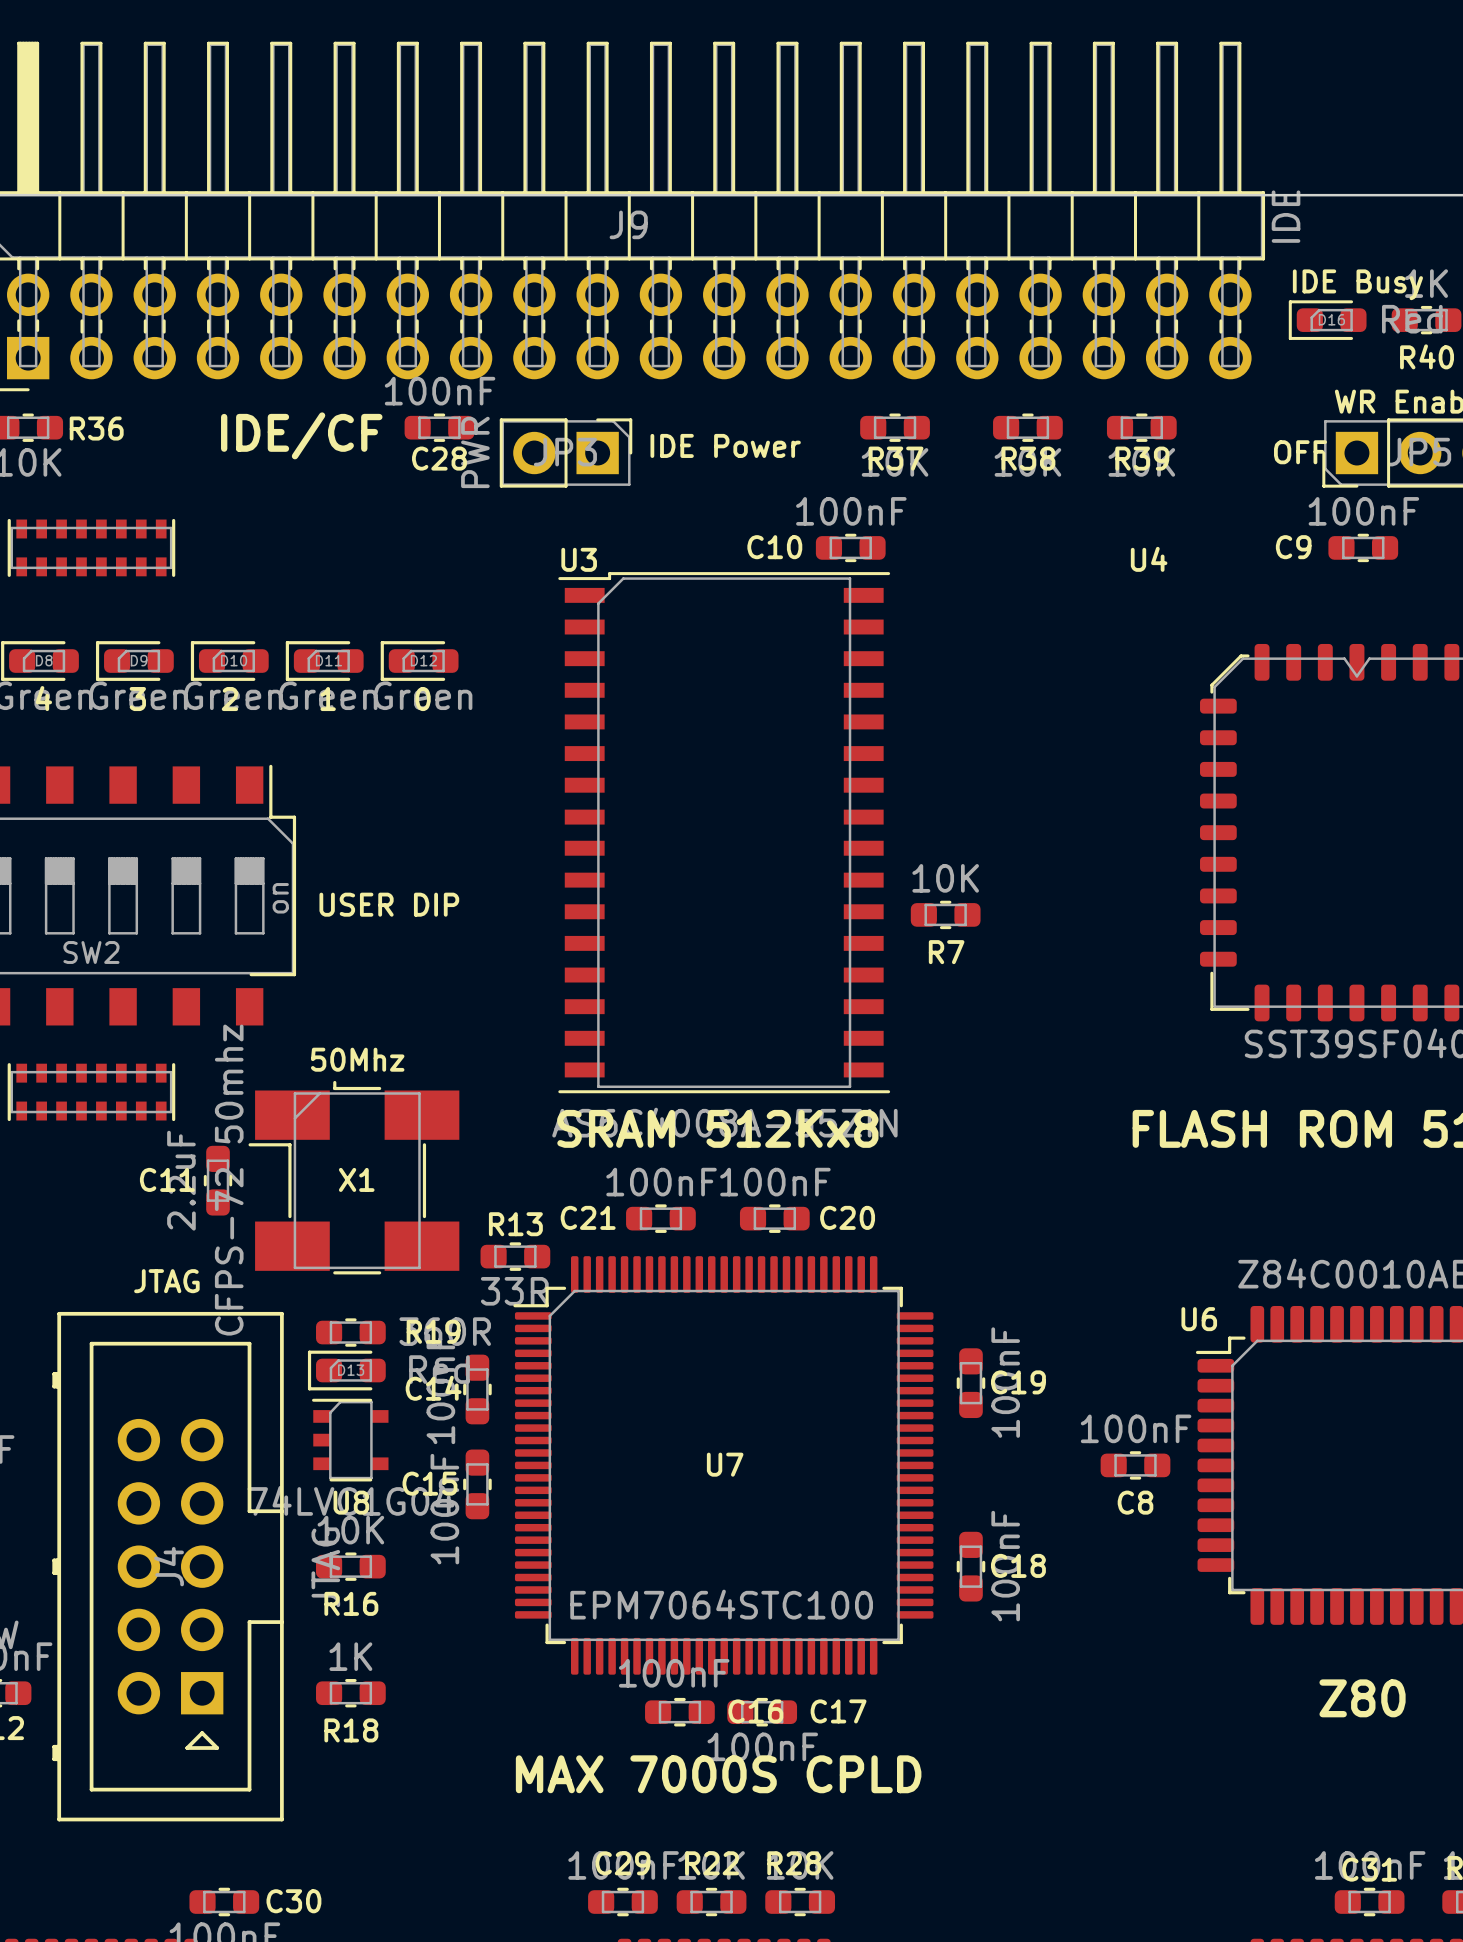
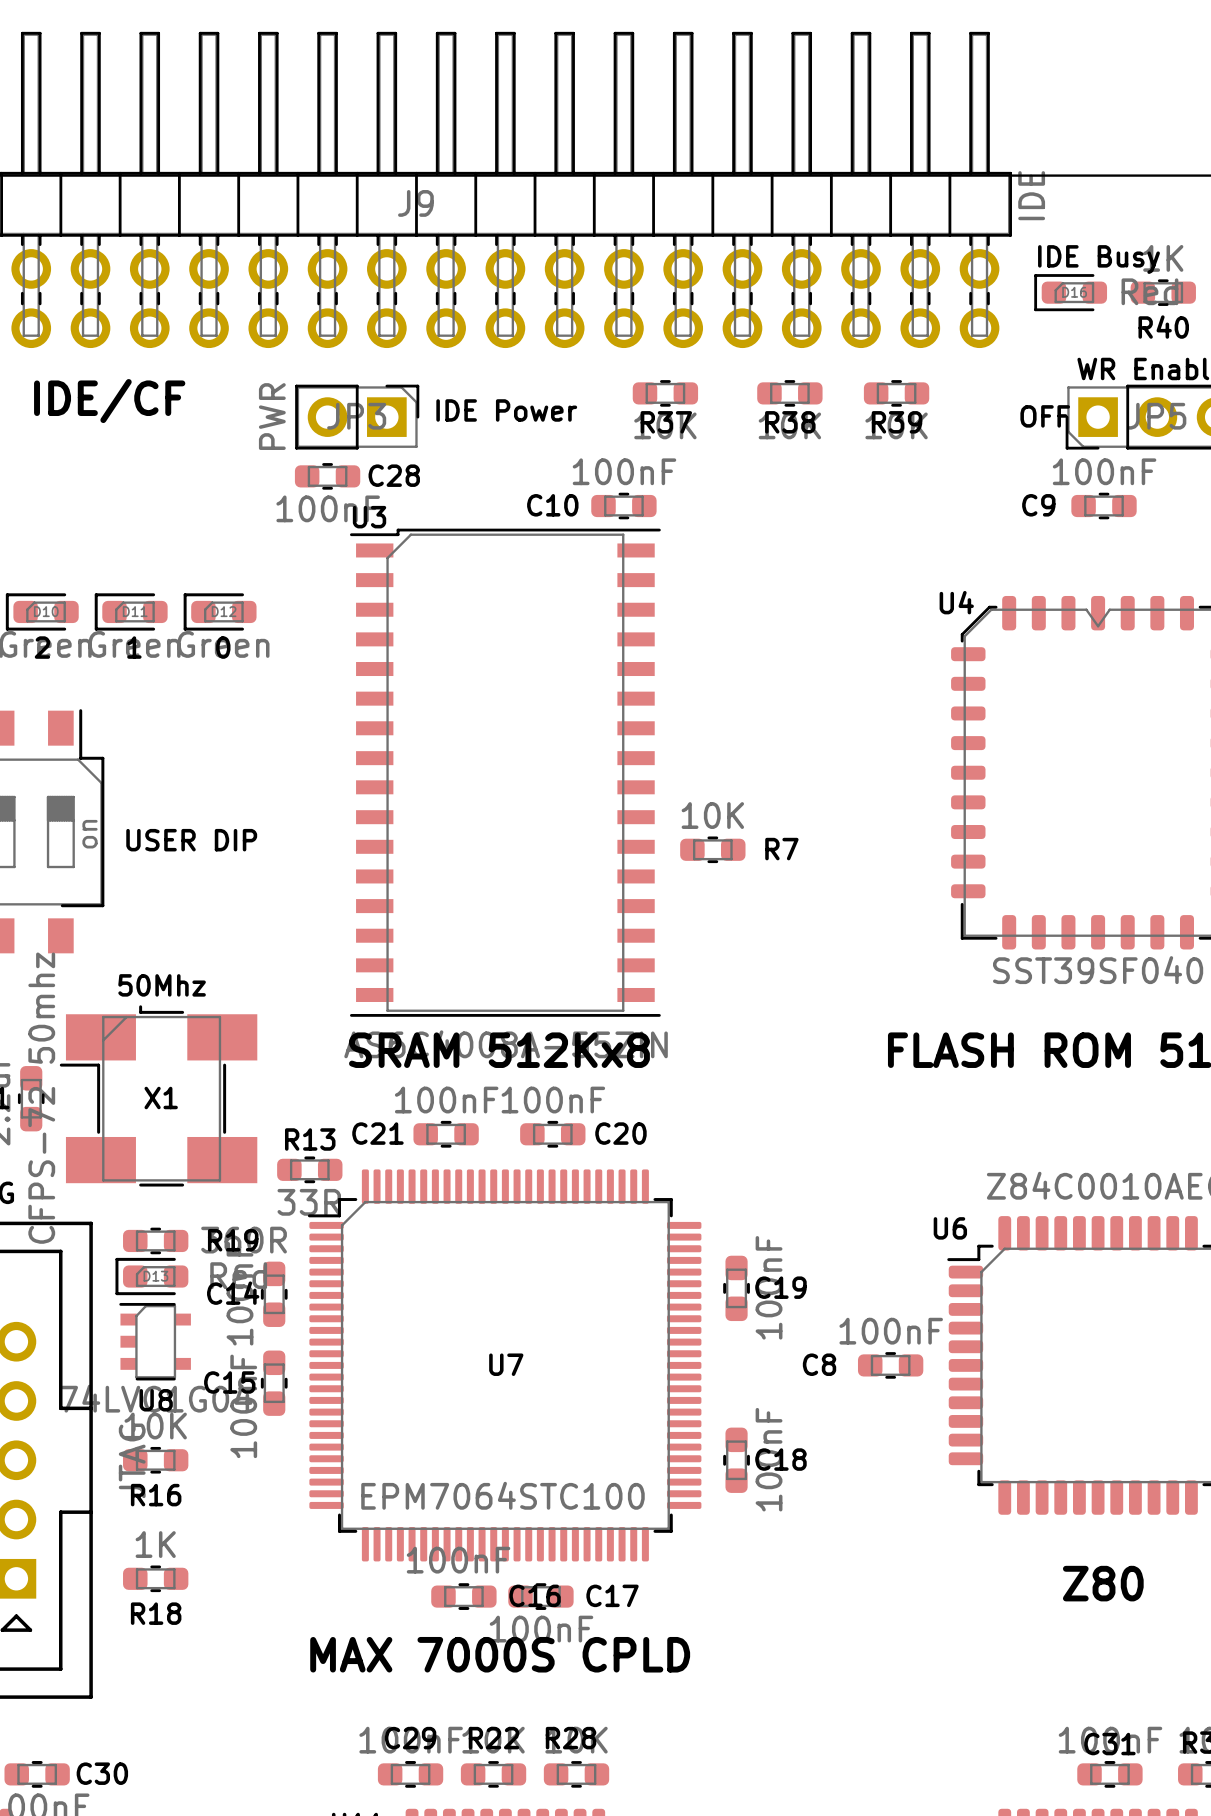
C28 value position: 100nF (440, 391) -> 100nF (328, 508)
C28 position: (439, 427) -> (327, 476)
C28 name position: C28 (439, 458) -> C28 (394, 475)
U4 name position: U4 (1149, 559) -> U4 (956, 602)
R7 name position: R7 (946, 952) -> R7 (781, 849)
C8 name position: C8 (1135, 1502) -> C8 (819, 1364)

